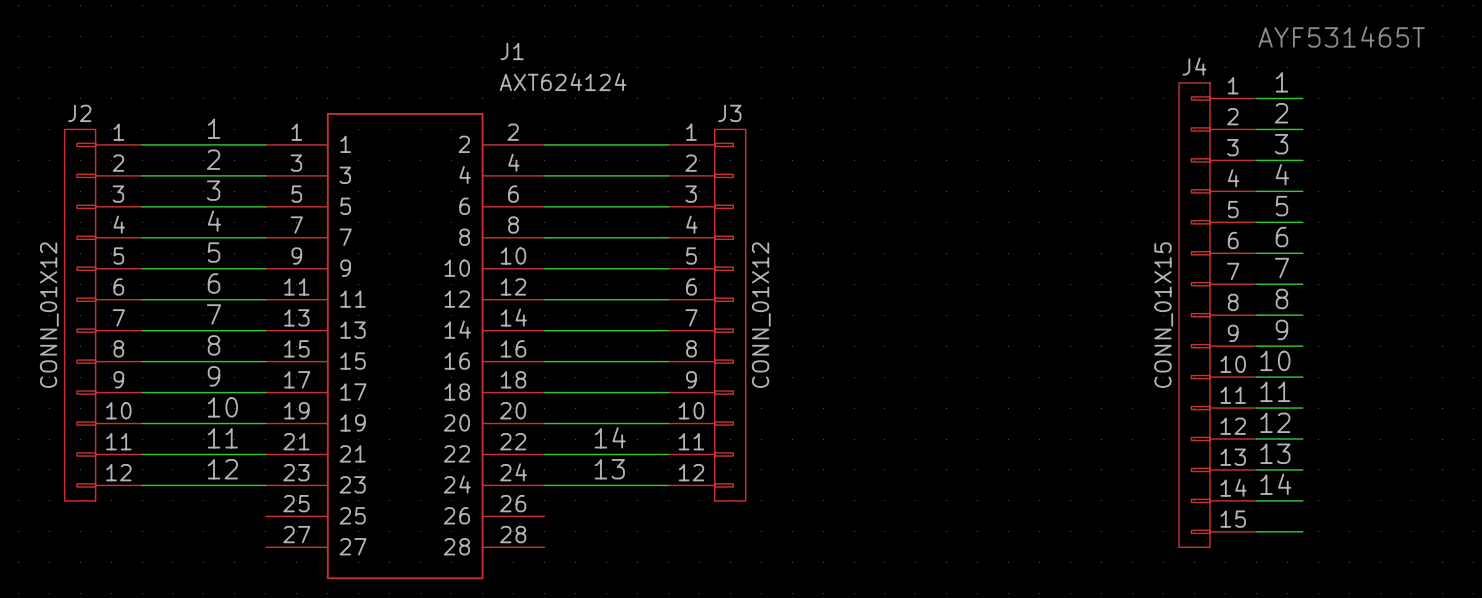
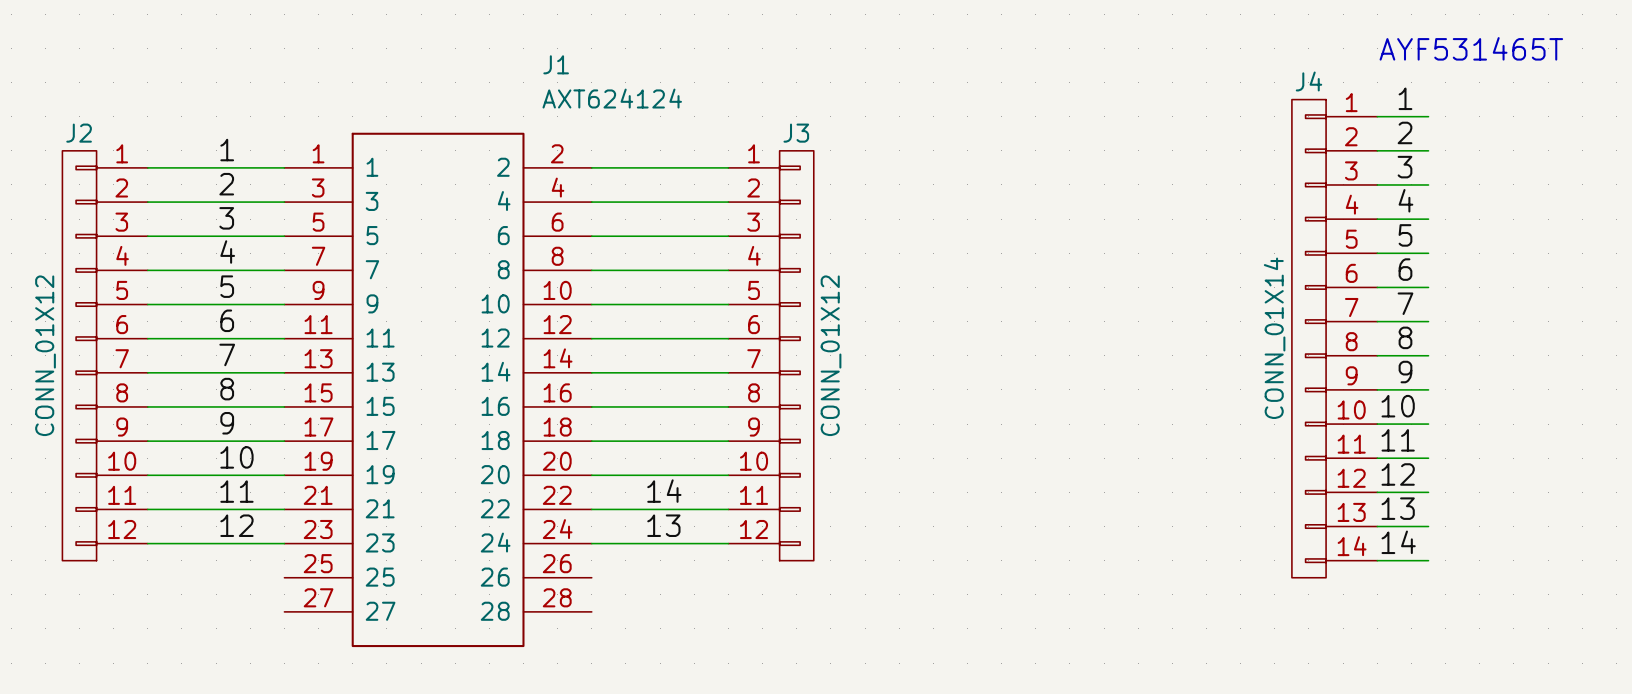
J4 symbol: [1179, 83, 1257, 548] -> [1291, 99, 1378, 578]
J4 value: CONN_01X15 (1163, 315) -> CONN_01X14 (1274, 338)
wire: (1256, 531) (1302, 531) -> none

